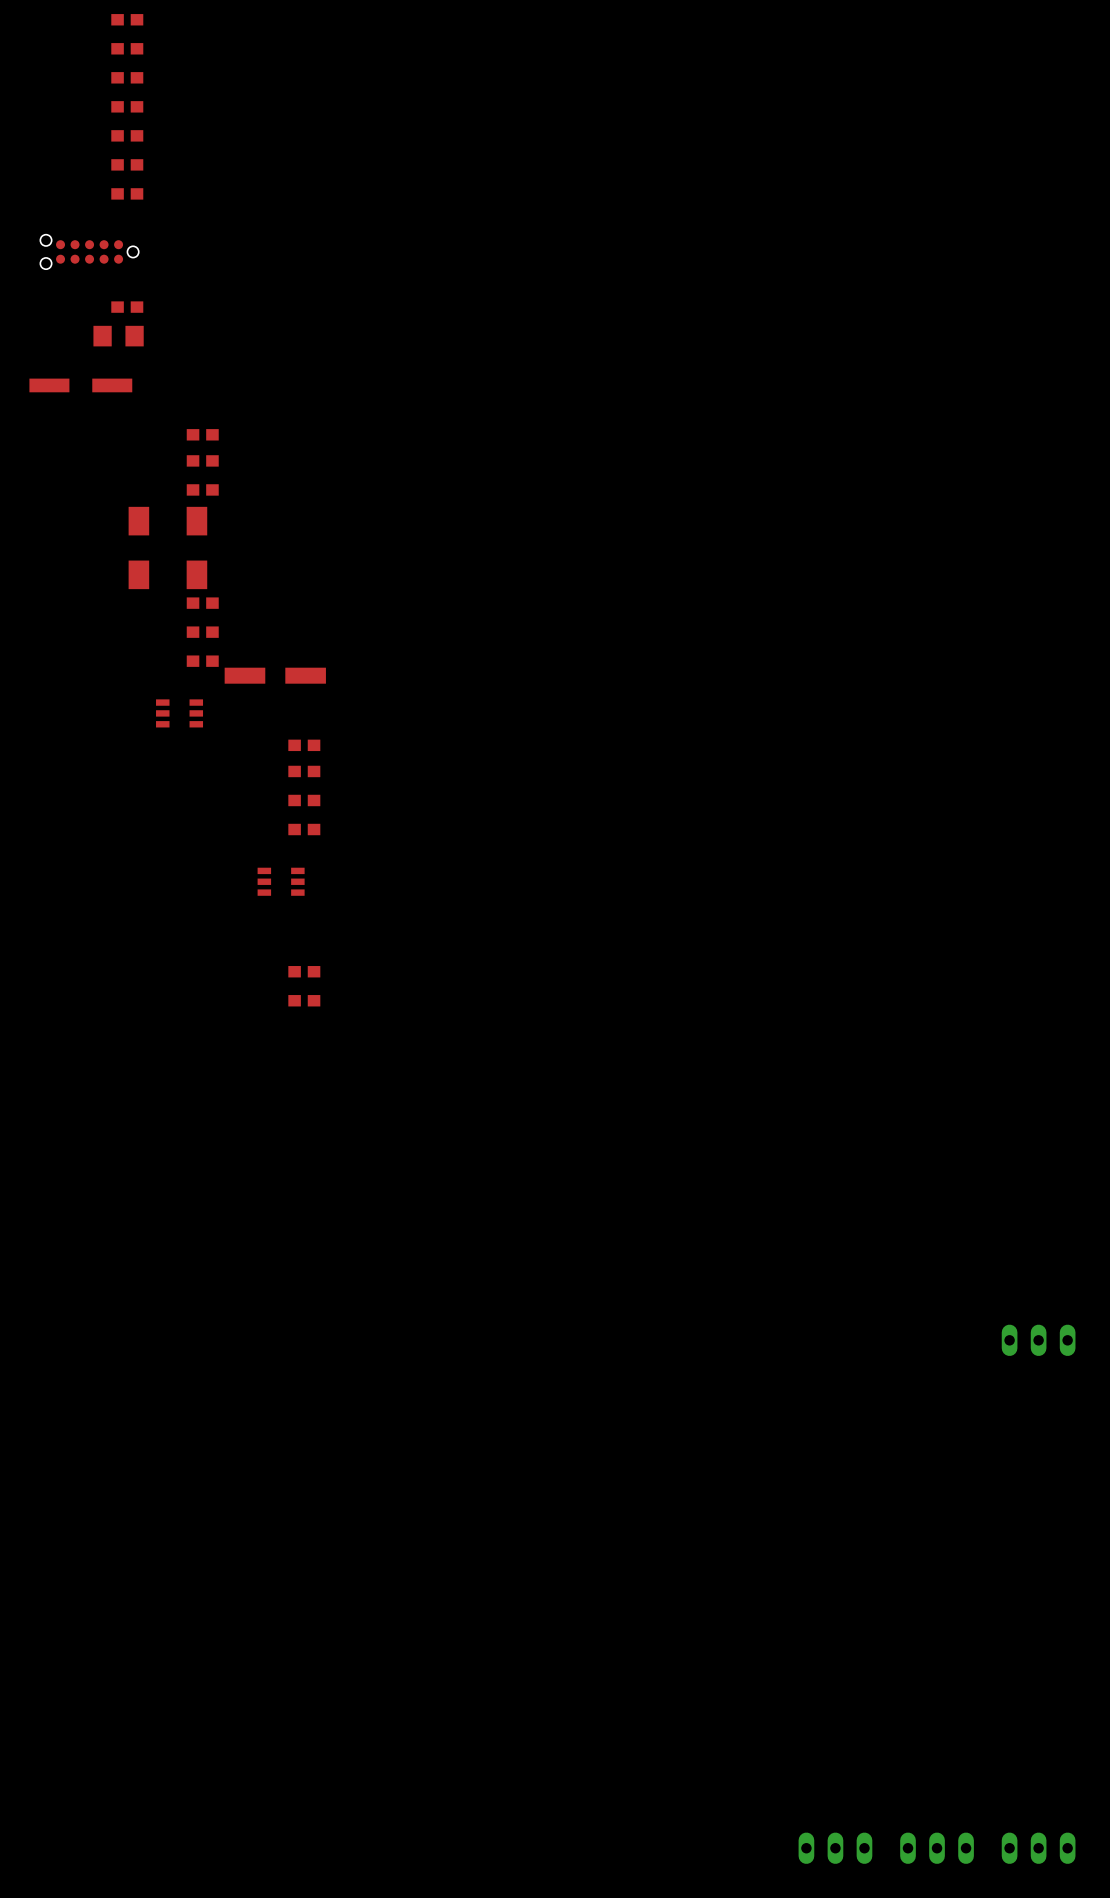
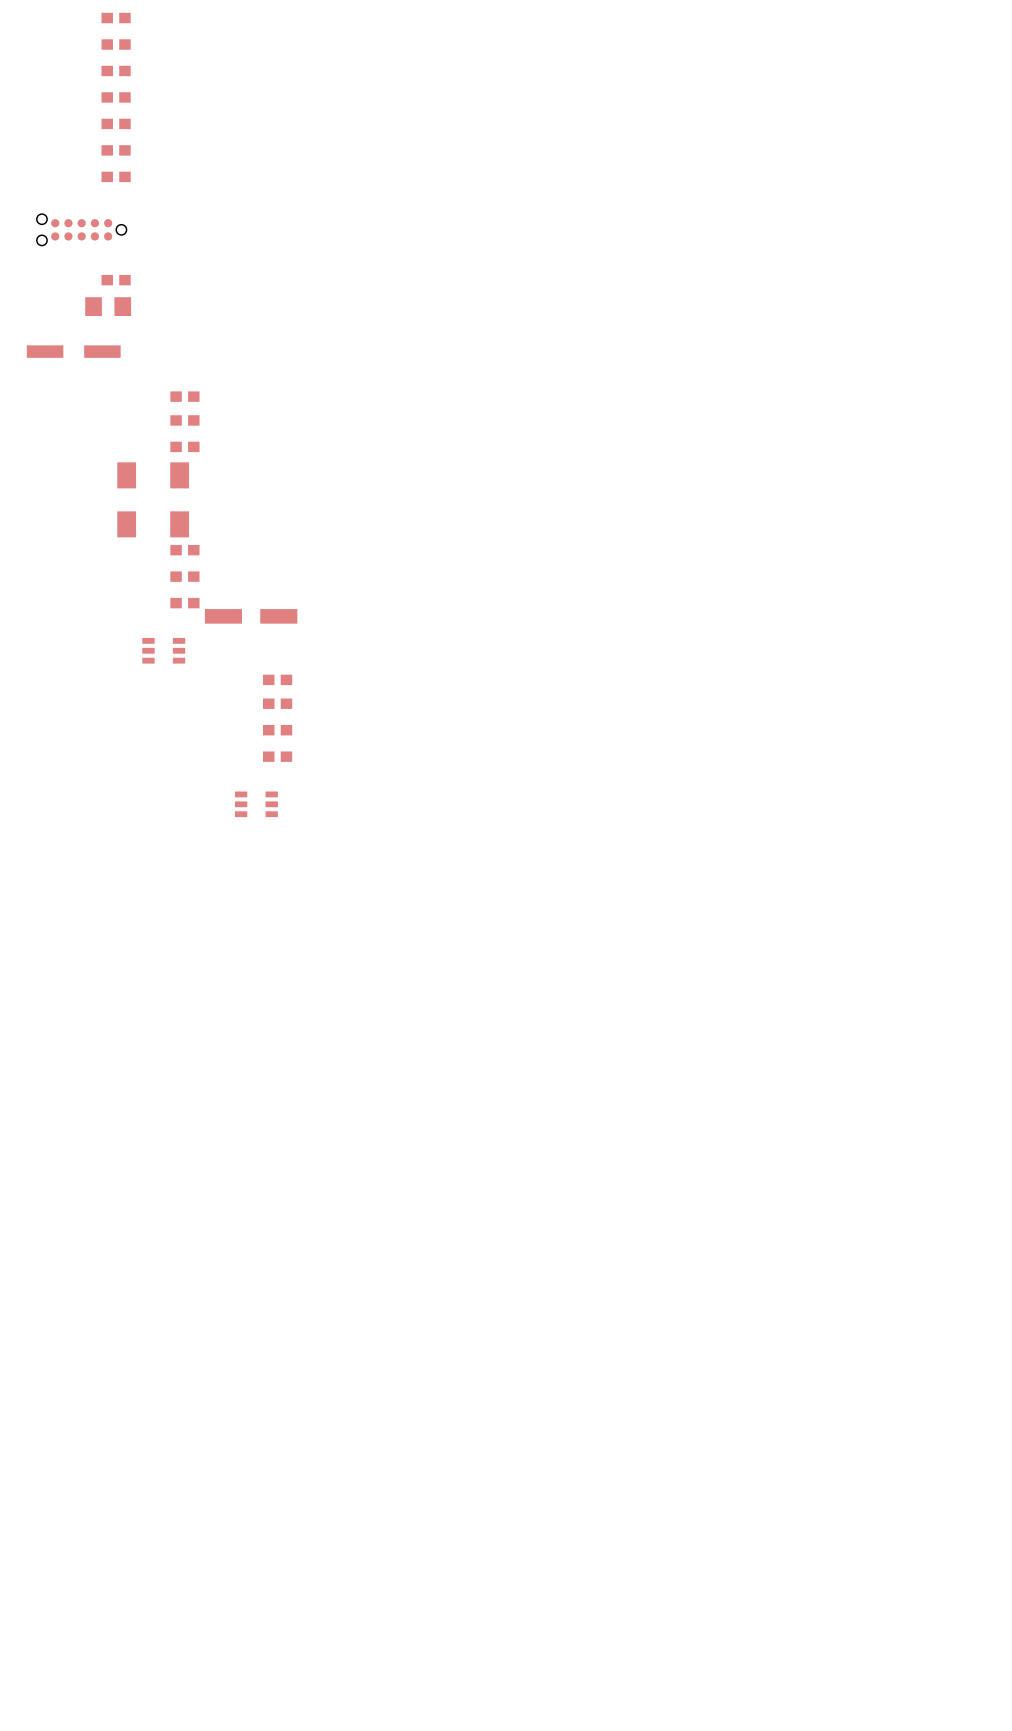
part: (304, 971) -> none
part: (304, 1000) -> none
part: (1038, 1340) -> none
part: (835, 1848) -> none
part: (937, 1848) -> none
part: (1038, 1848) -> none

